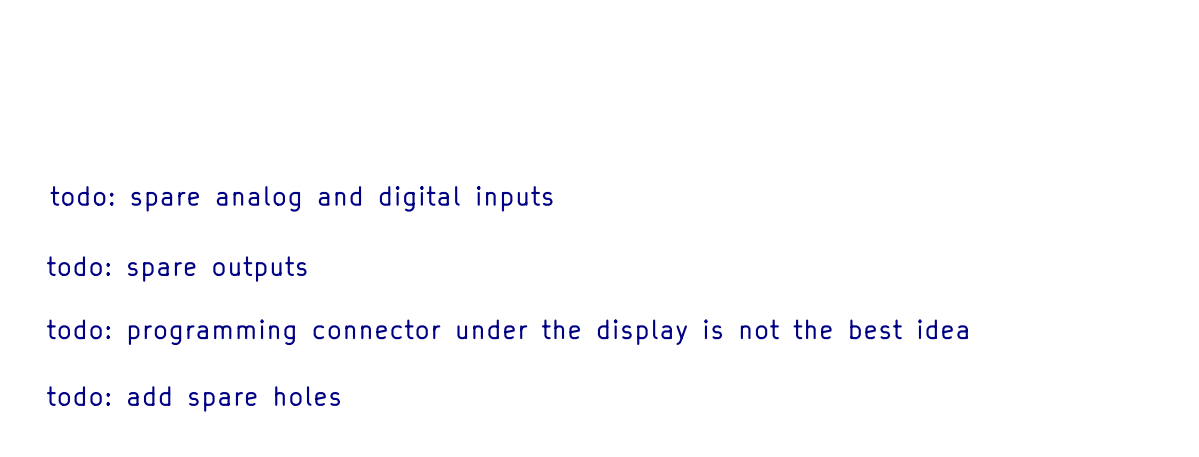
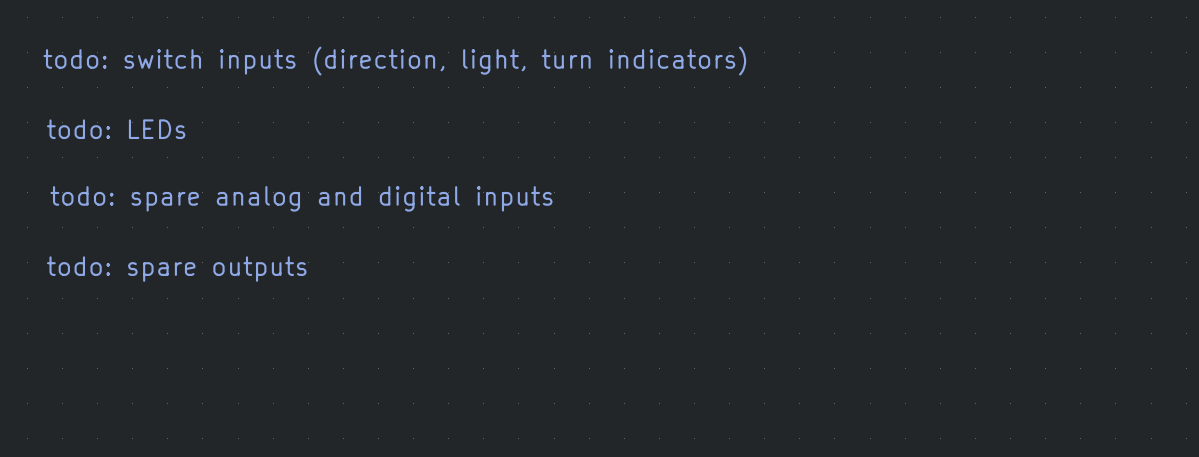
text: none -> todo: switch inputs (direction, light, turn indicators) (394, 61)
text: none -> todo: LEDs (116, 129)
text: todo: programming connector under the display is not the best idea (507, 332) -> none
text: todo: add spare holes (193, 398) -> none

